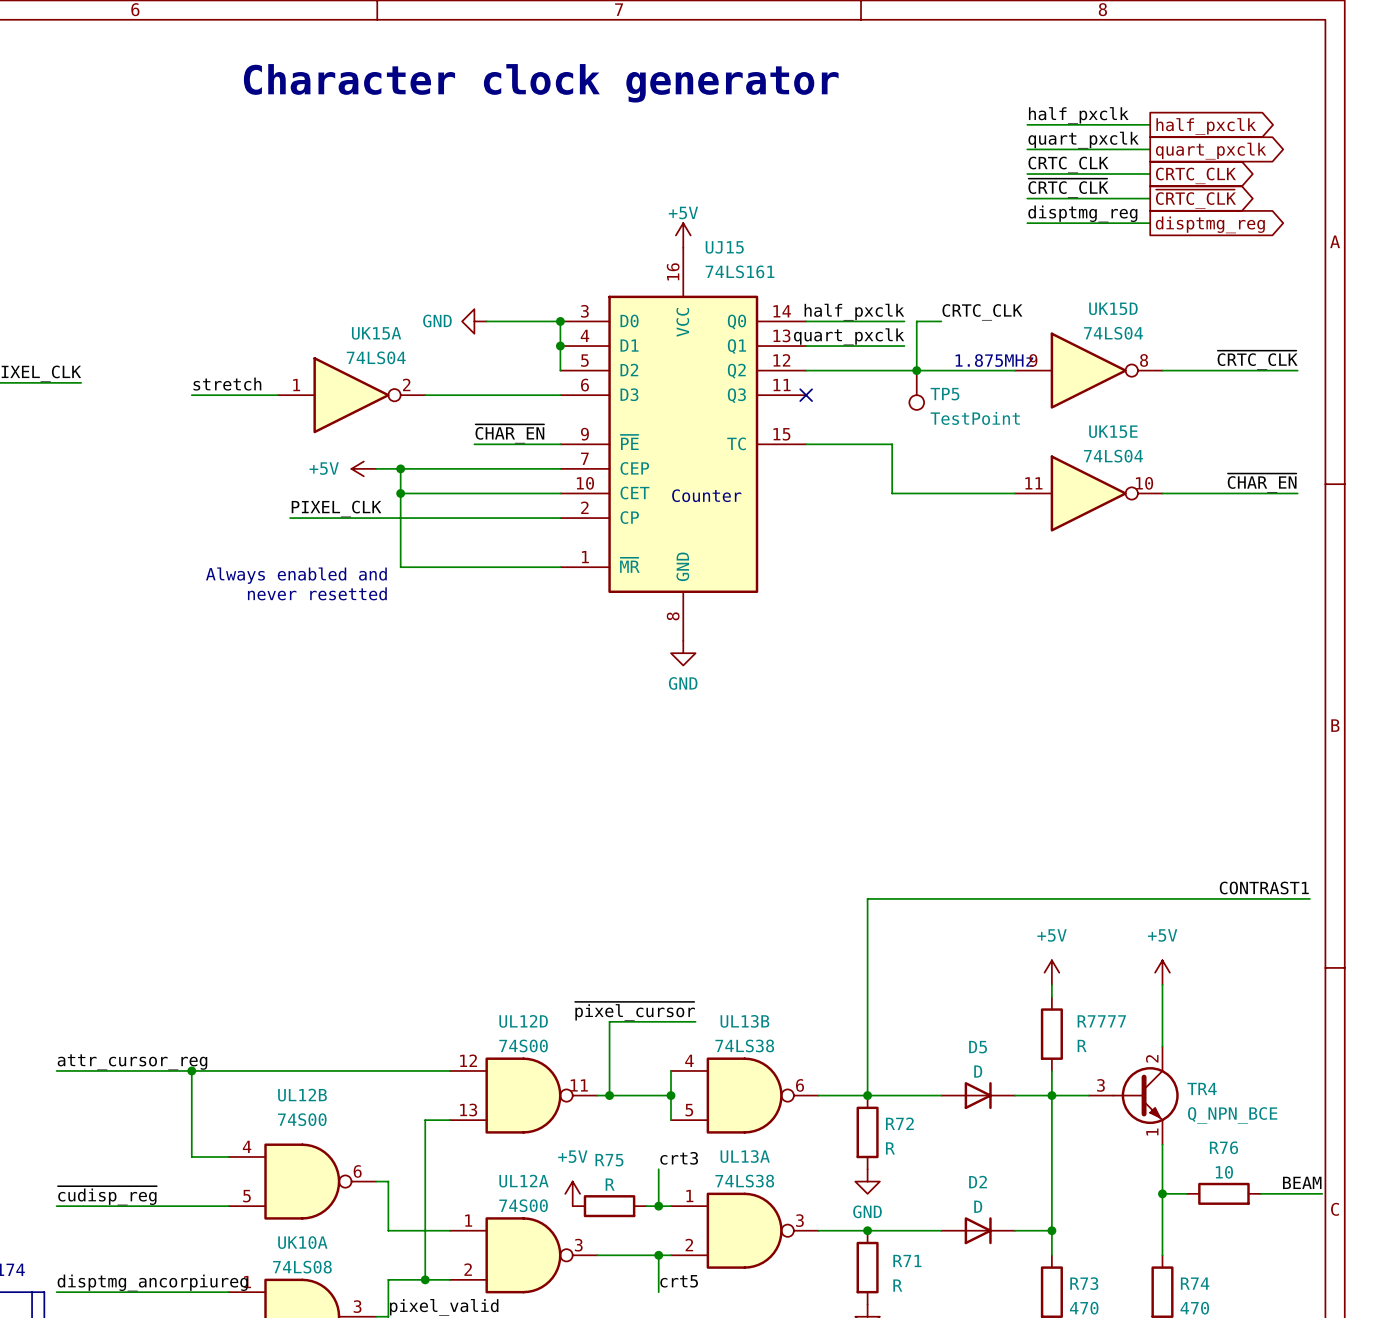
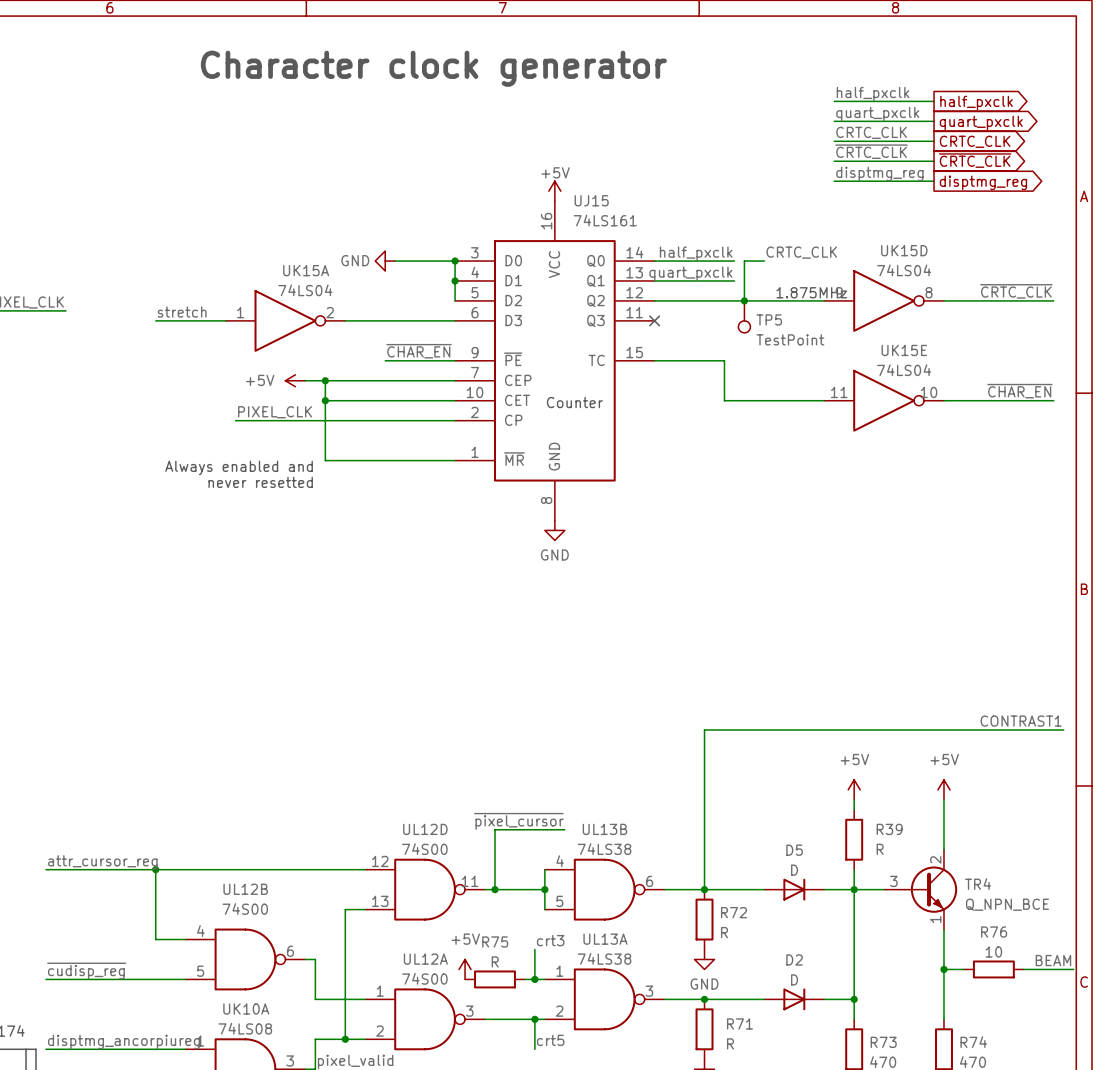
R7777 name: R7777 (1101, 1021) -> R39 (889, 829)

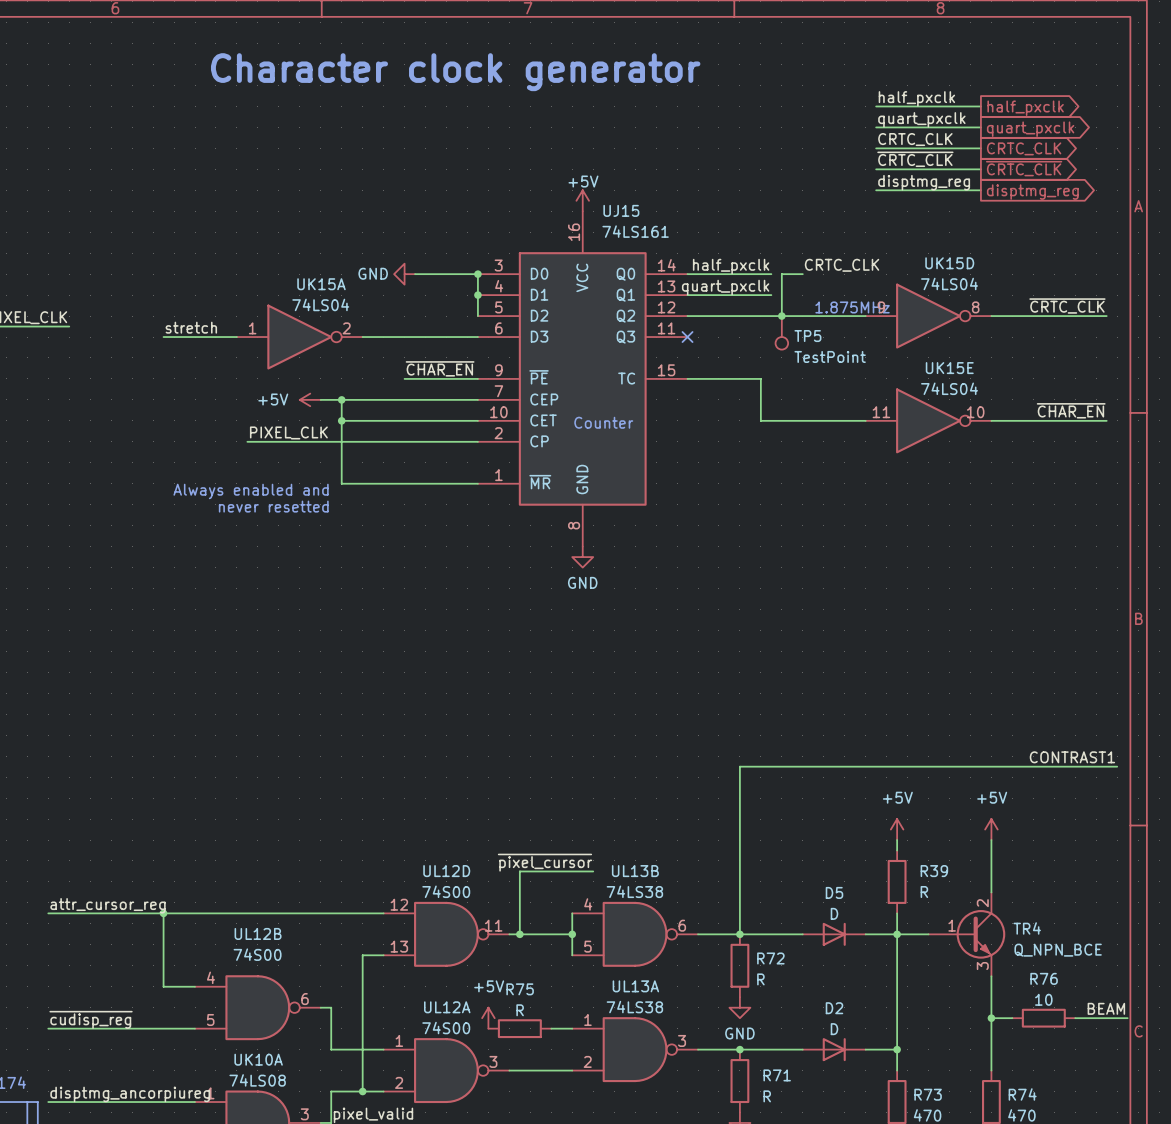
TR4 symbol: [884, 849, 958, 930] -> [928, 892, 1006, 977]
label: crt3 (550, 940) -> none
wire: (534, 949) (534, 979) -> none
junction: (534, 979) -> none
wire: (534, 1019) (534, 1049) -> none
junction: (534, 1019) -> none
label: crt5 (550, 1040) -> none

